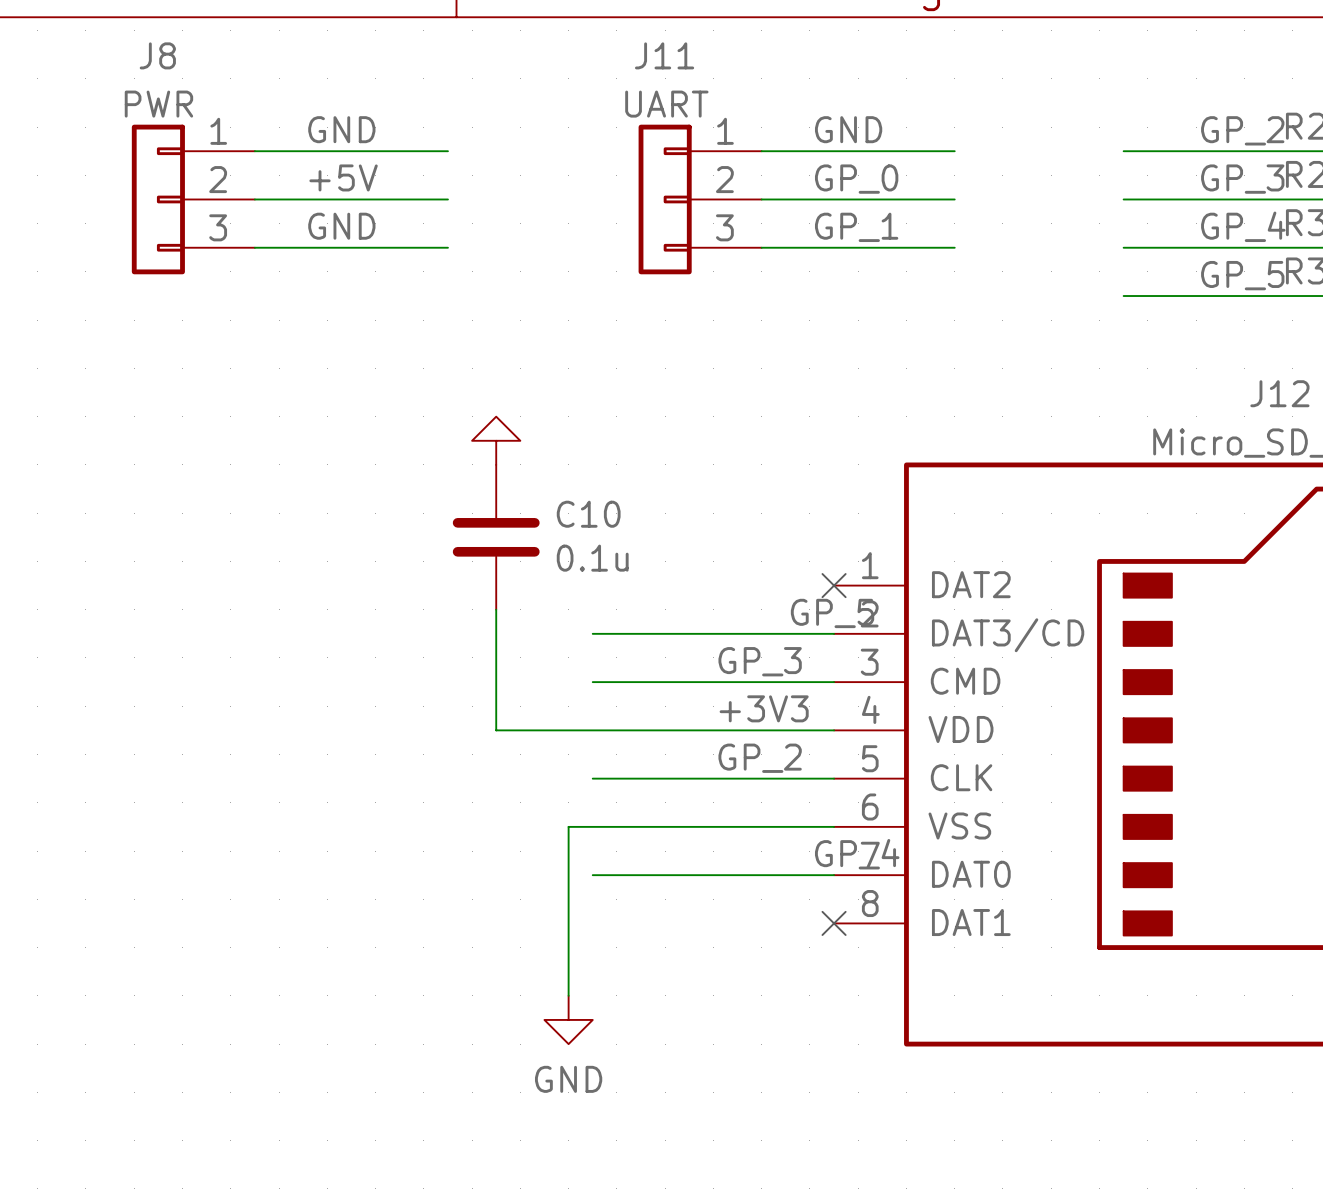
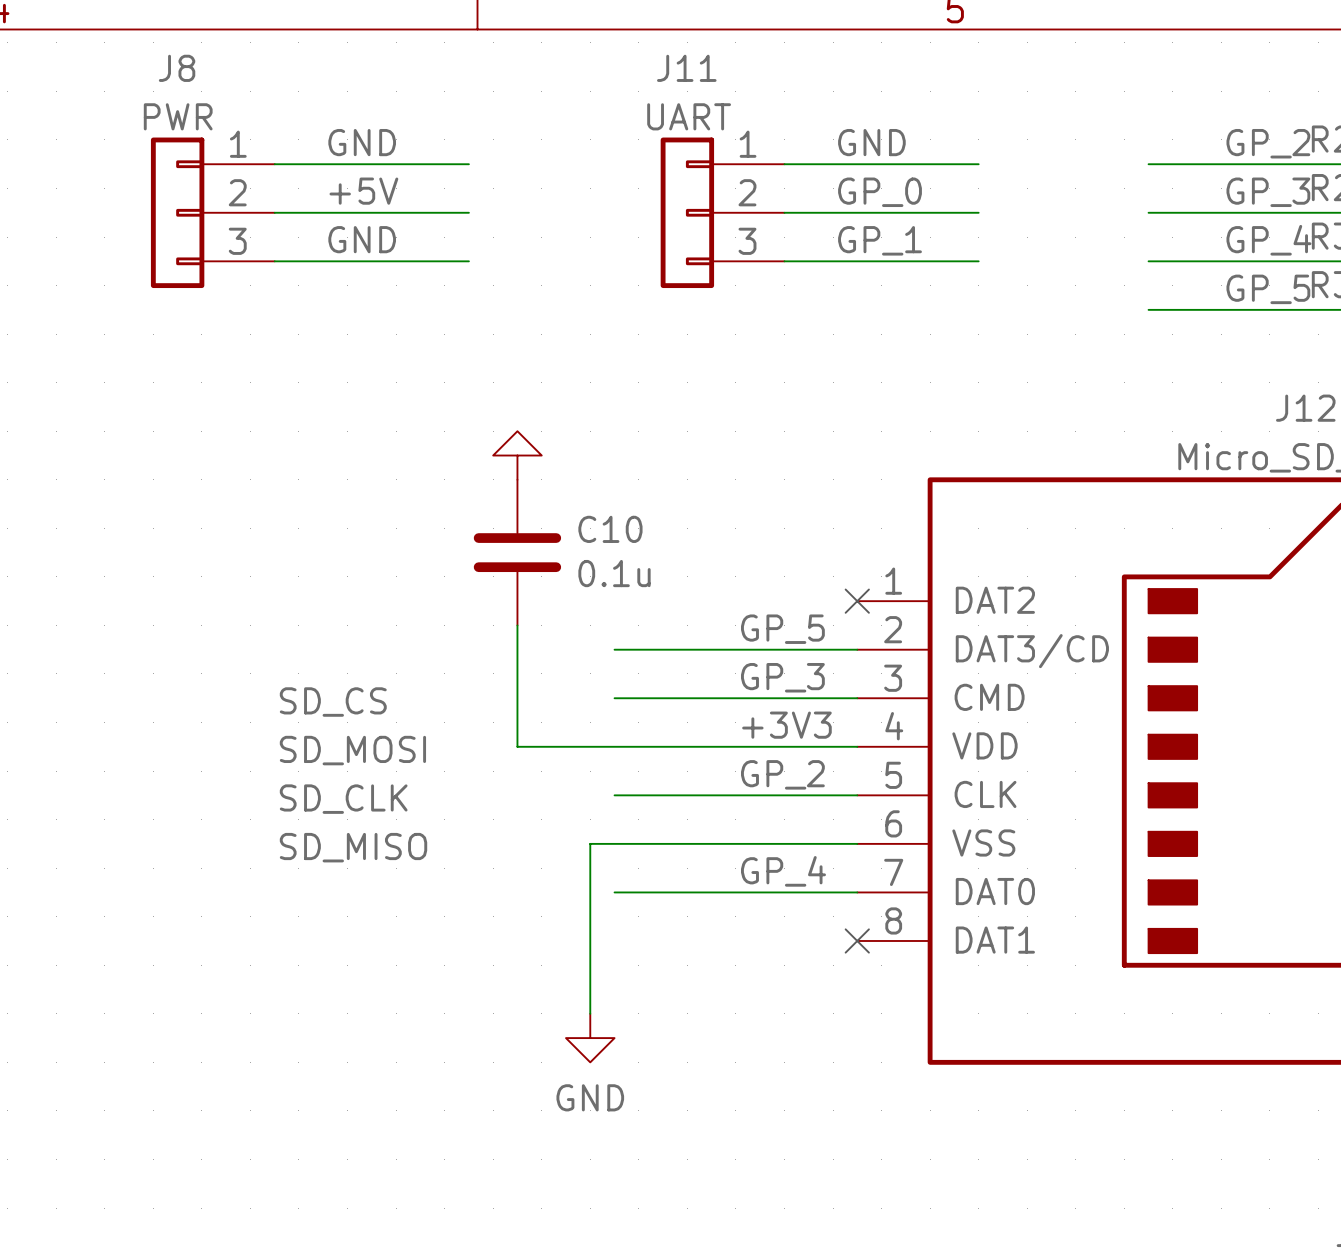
label position: GP_5 (832, 613) -> GP_5 (782, 629)
label: none -> SD_CS (333, 702)
label: none -> SD_MOSI (352, 750)
label: none -> SD_CLK (343, 799)
label: none -> SD_MISO (353, 847)
label position: GP_4 (857, 854) -> GP_4 (783, 871)

